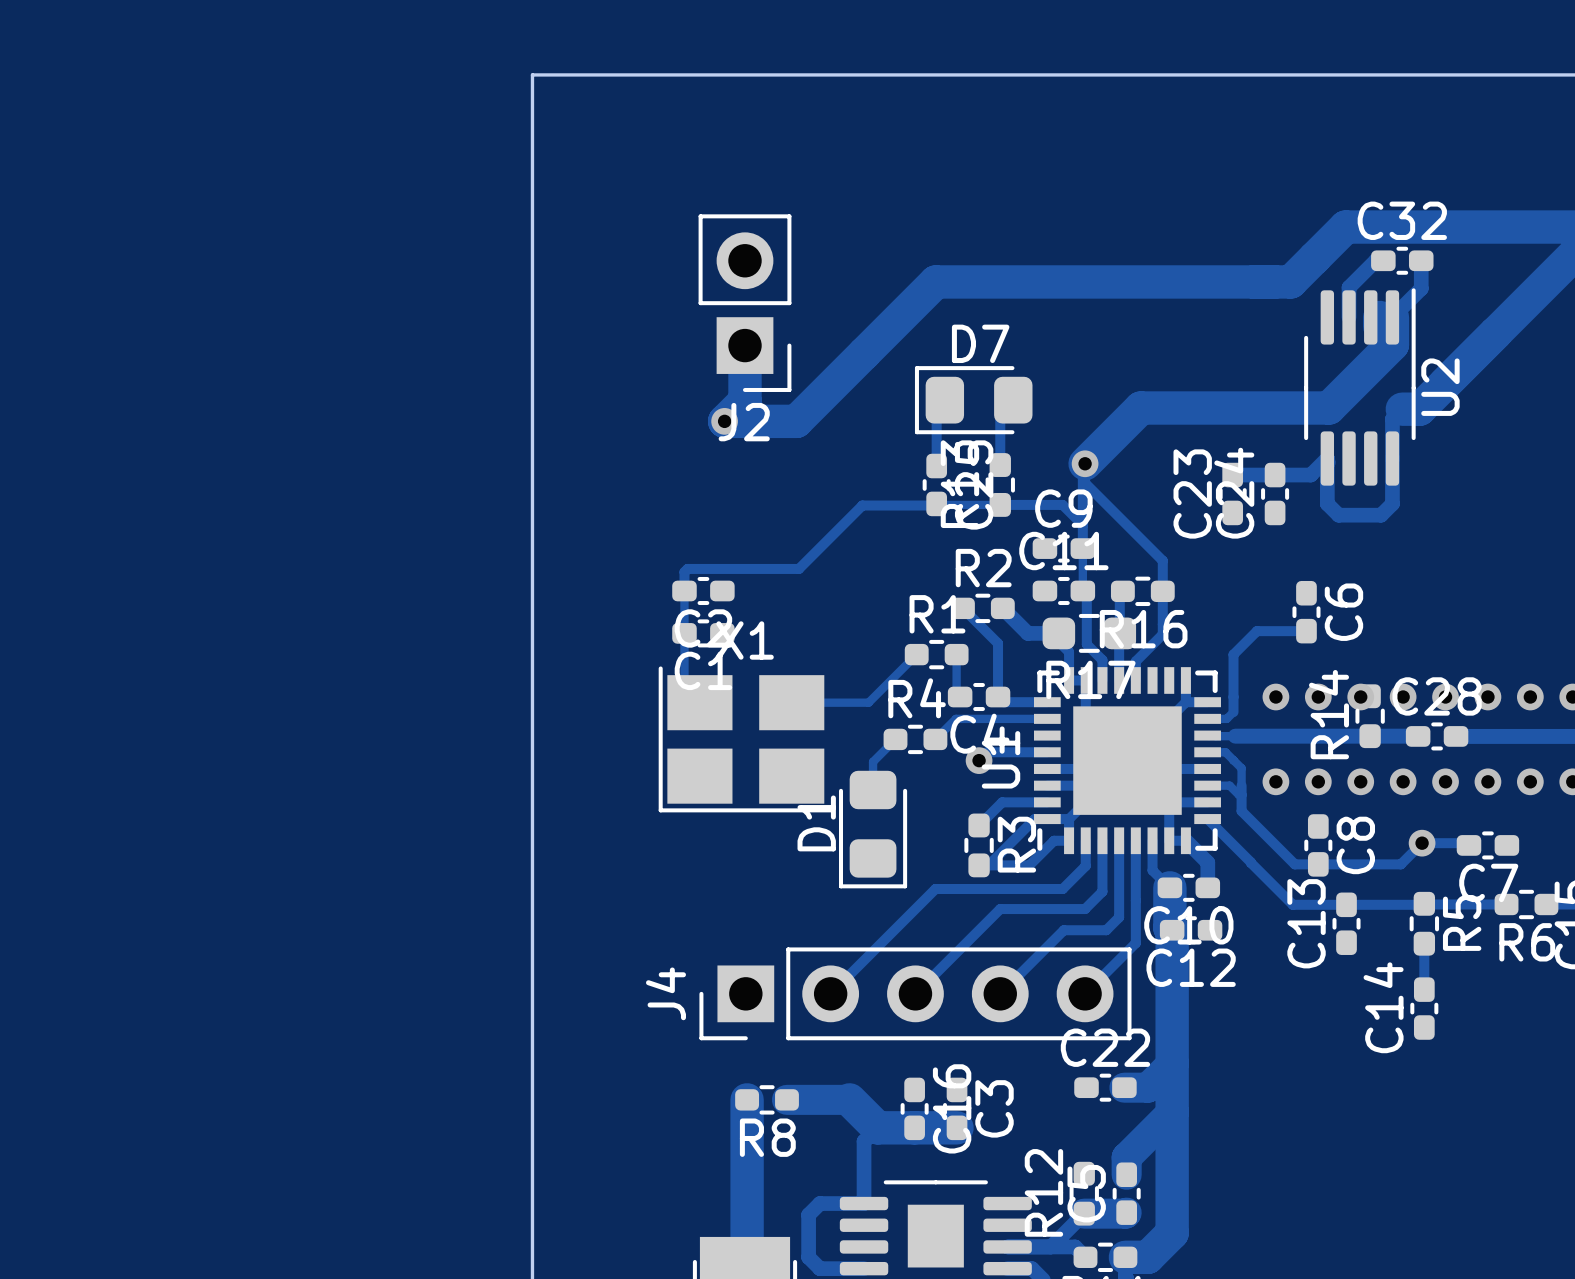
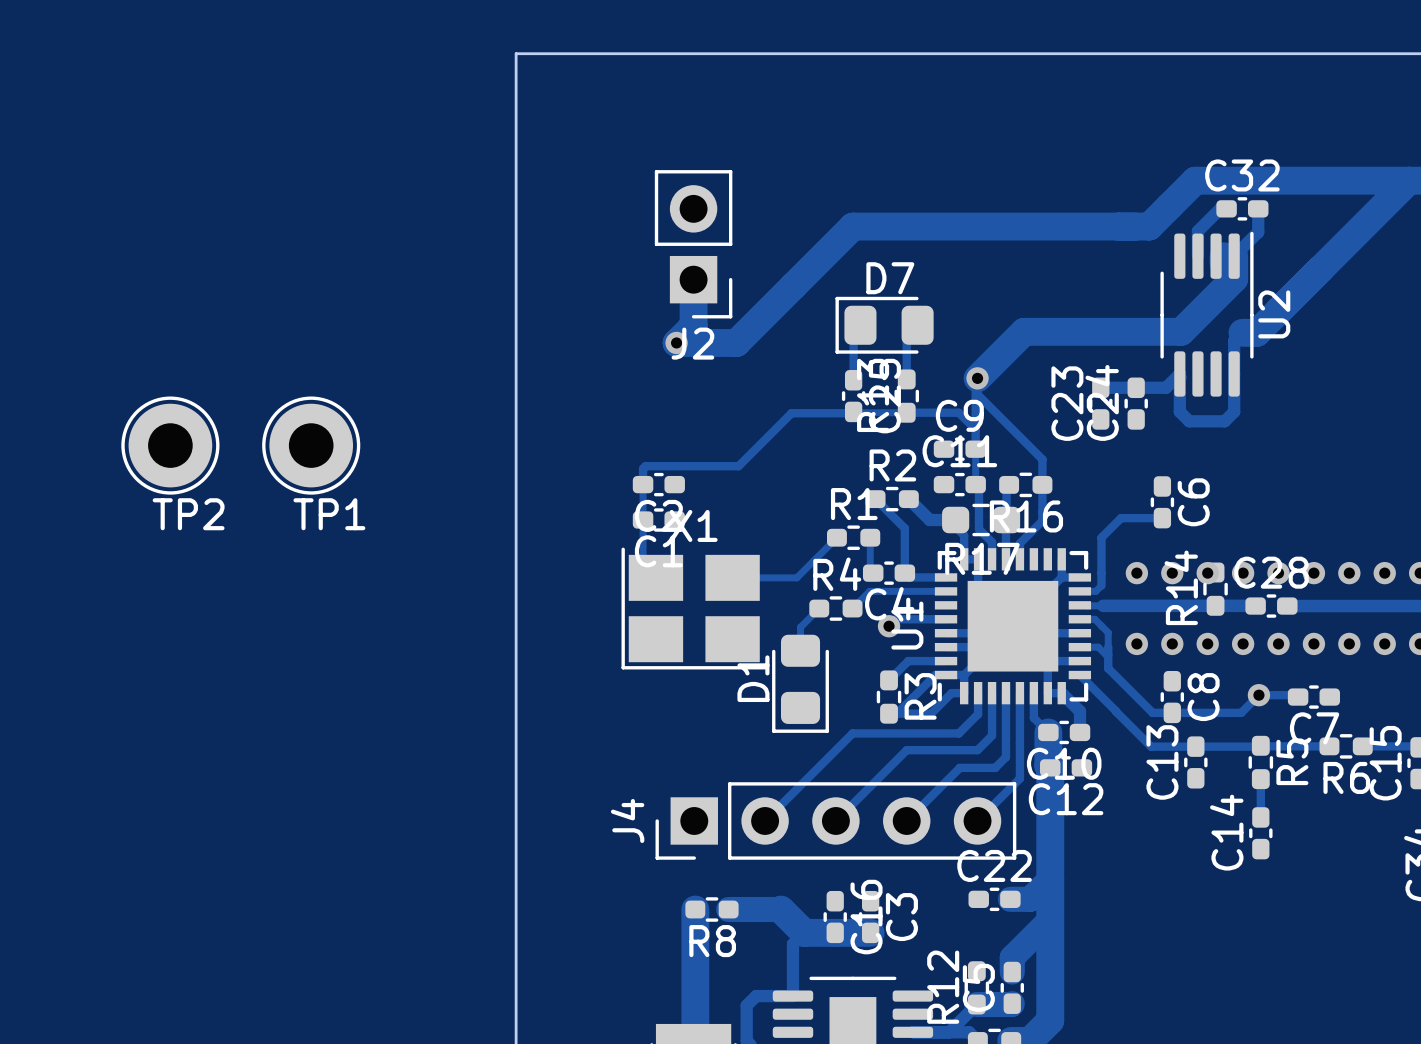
TP2: none -> (170, 445)
TP1: none -> (311, 445)

